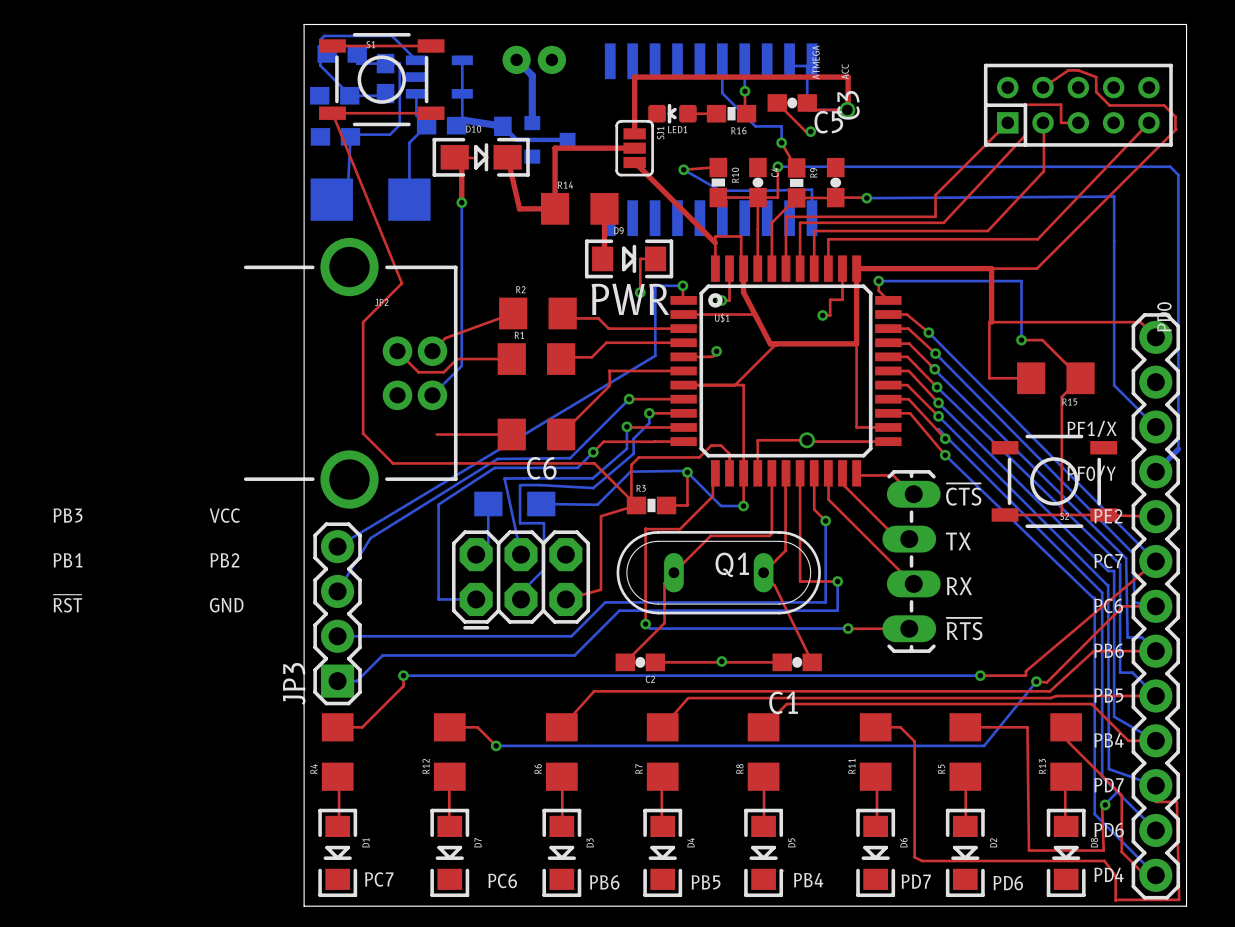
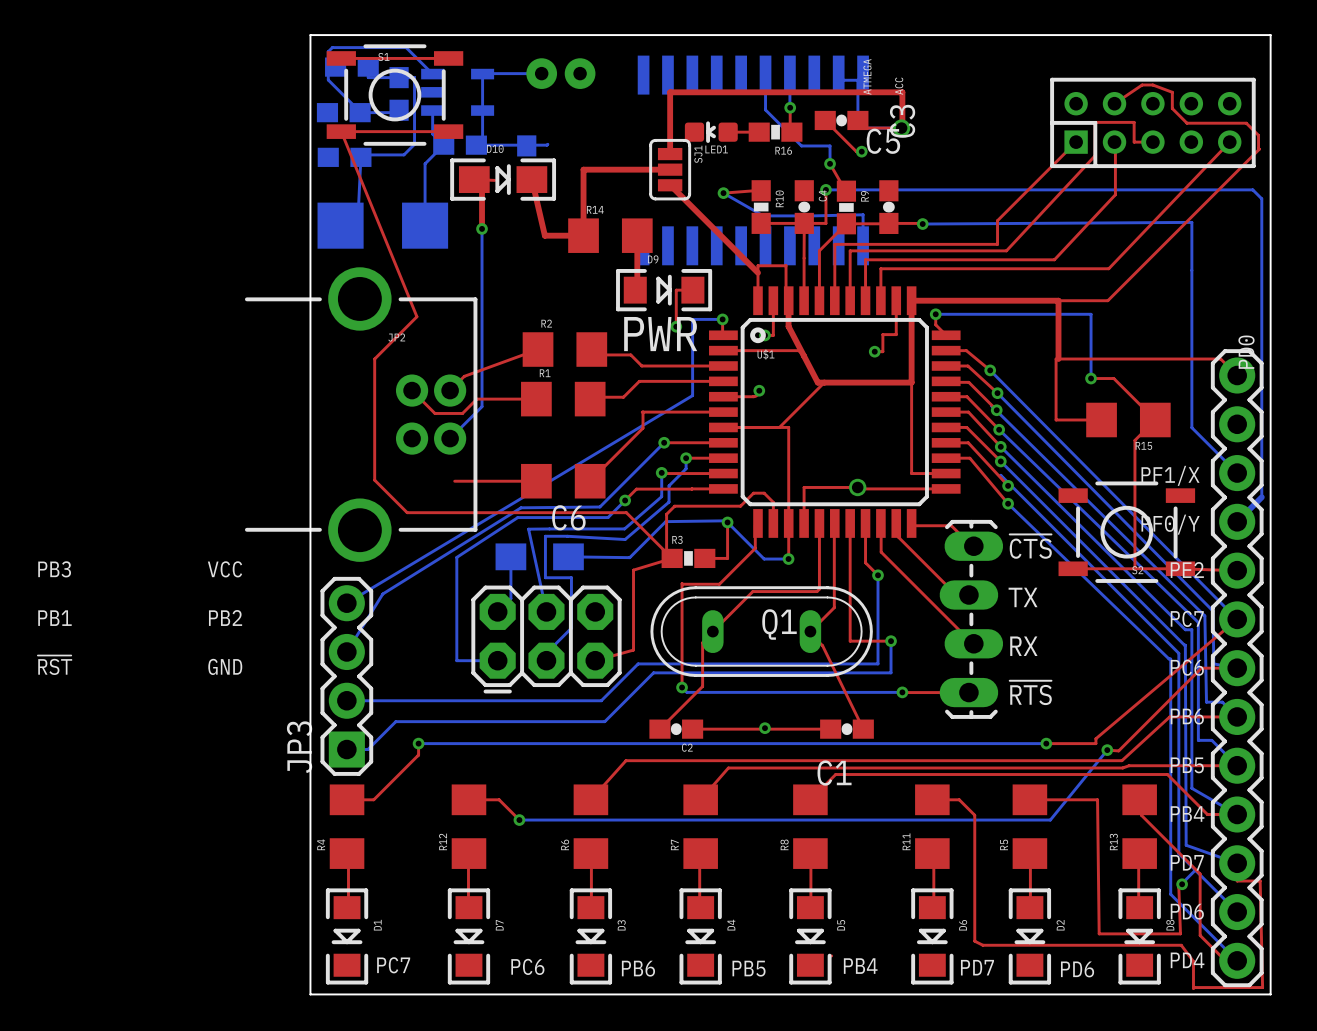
bottom track: (516, 59) (532, 75) (532, 123) -> (541, 73) (483, 73)
bottom track: (462, 119) (502, 126) (516, 139) (567, 139) -> none
bottom track: none -> (547, 144) (476, 145)
part: (549, 139) -> none

